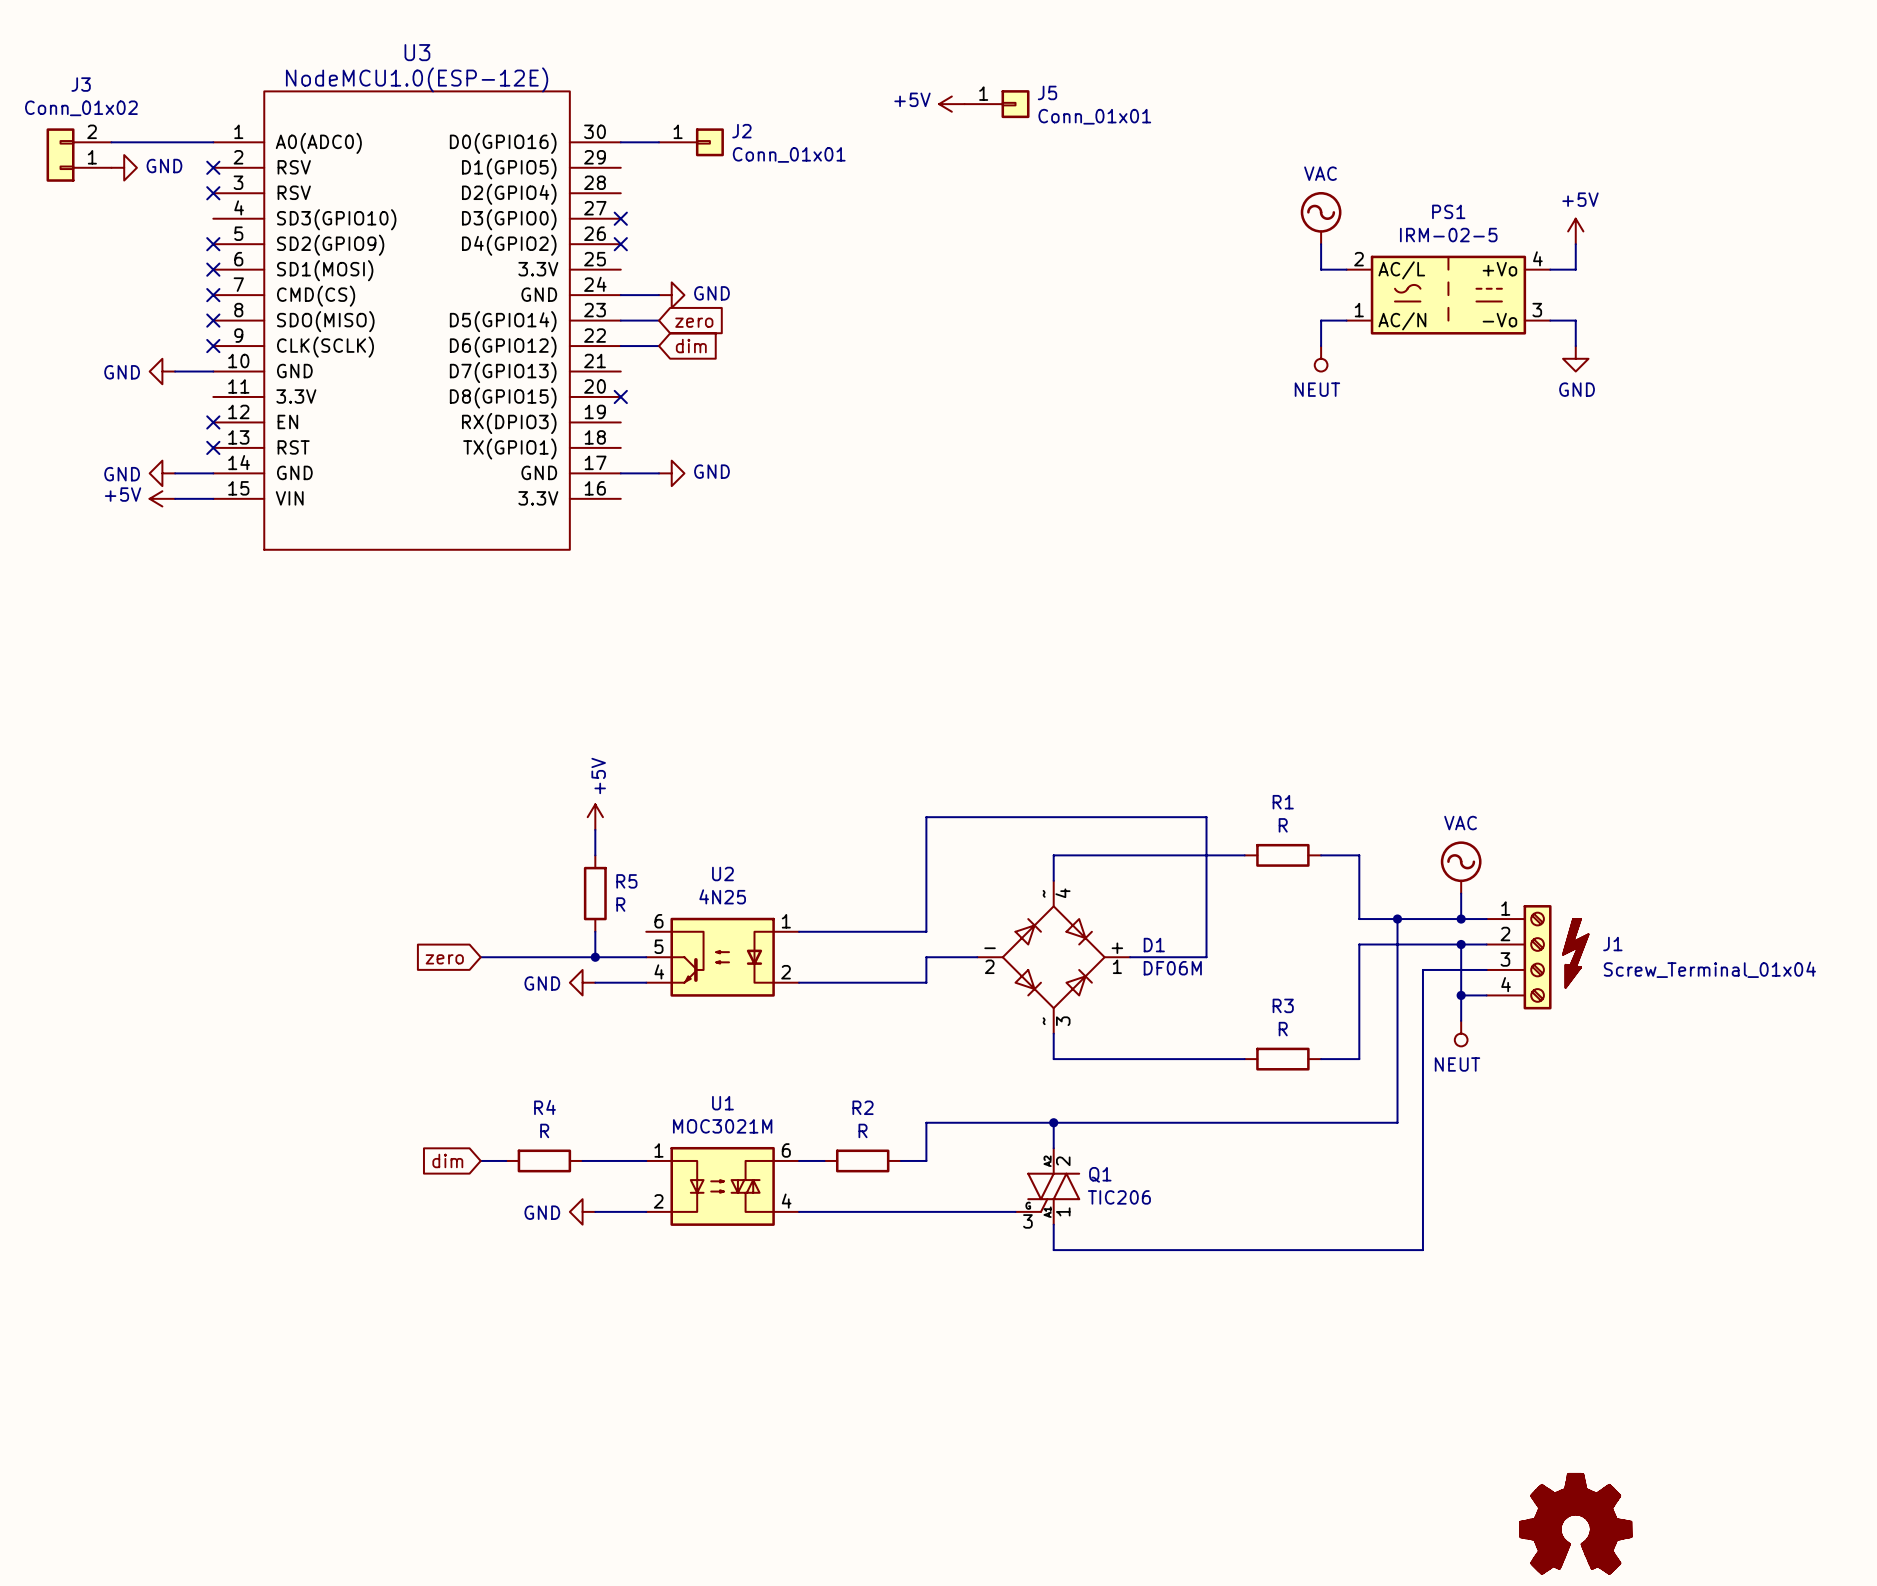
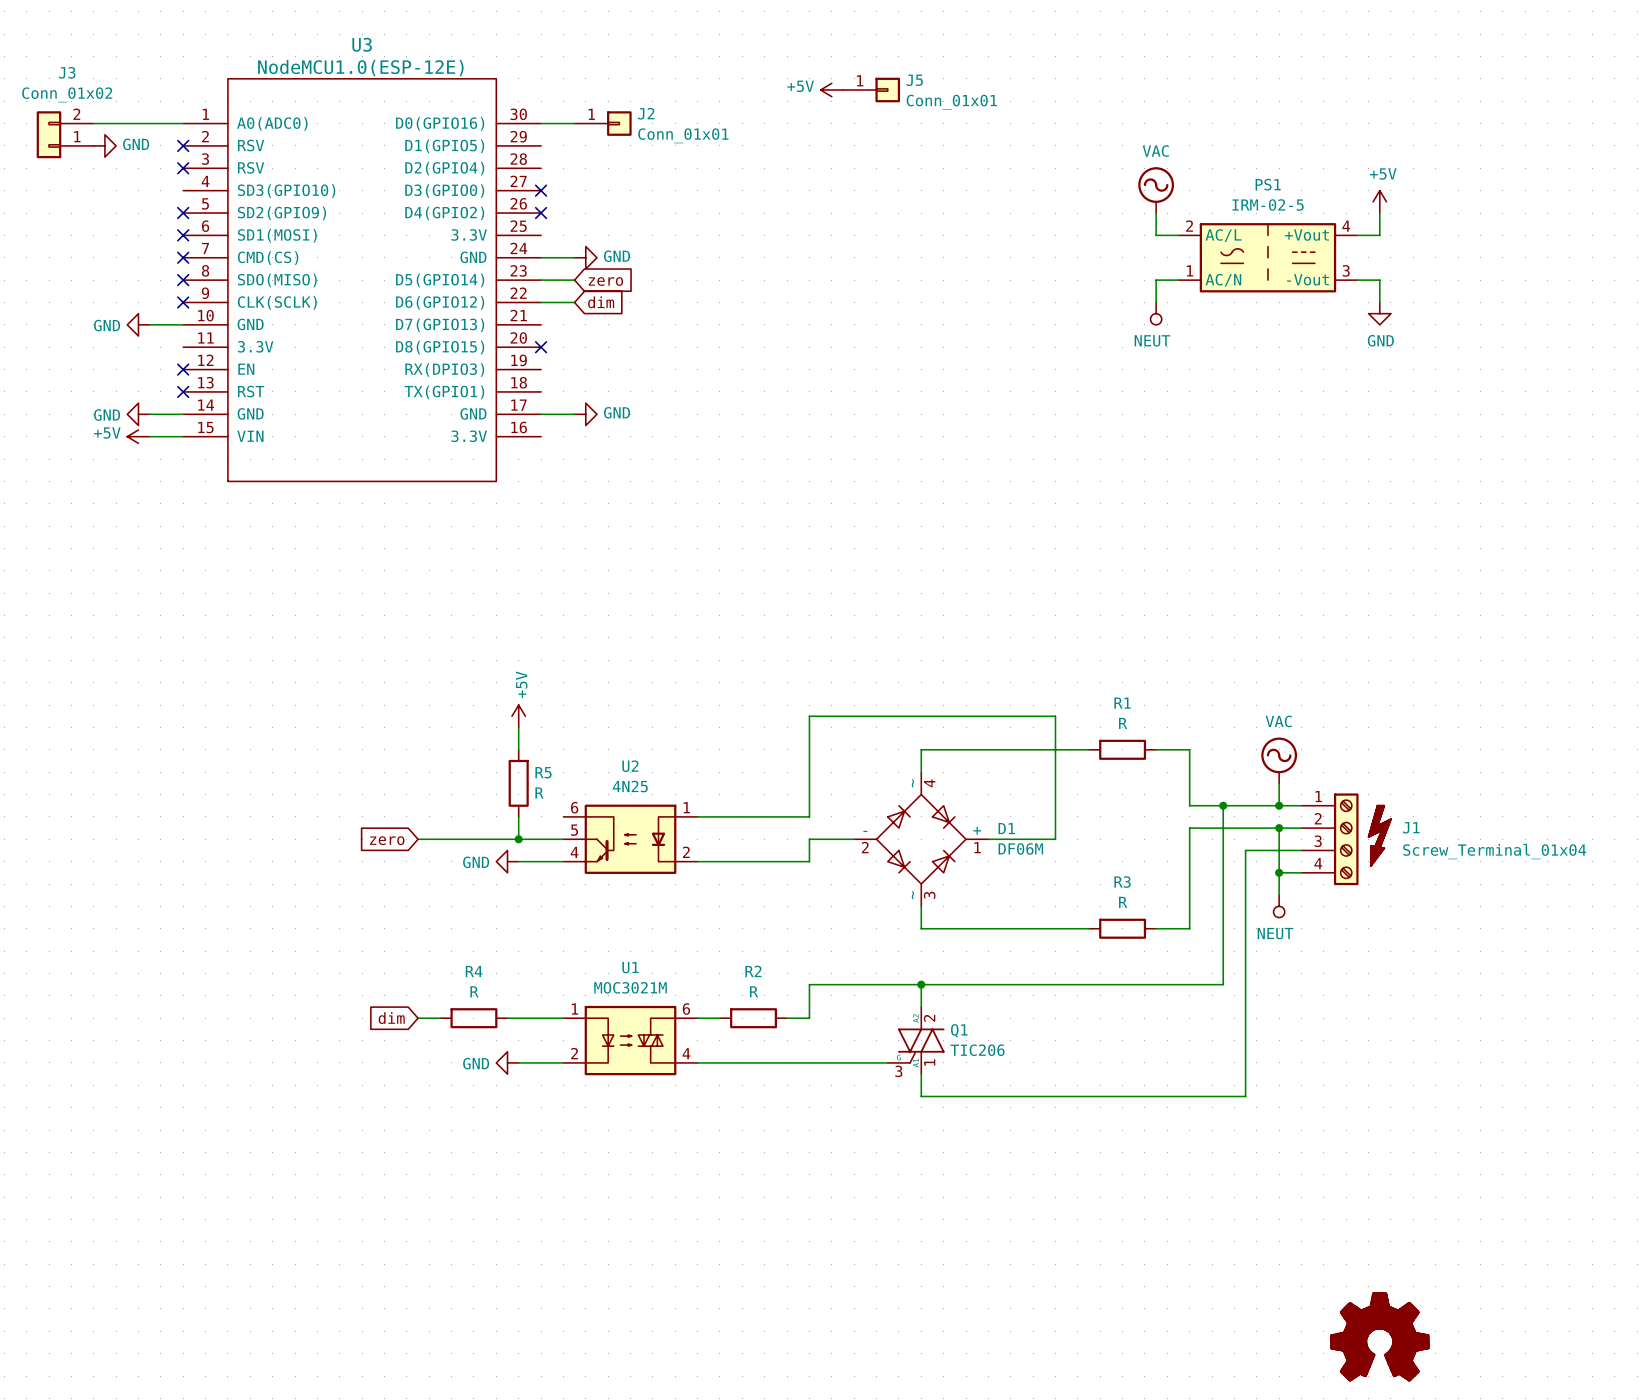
PS1 pin name: +Vo (1499, 269) -> +Vout (1307, 235)
PS1 pin name: -Vo (1499, 320) -> -Vout (1308, 279)

